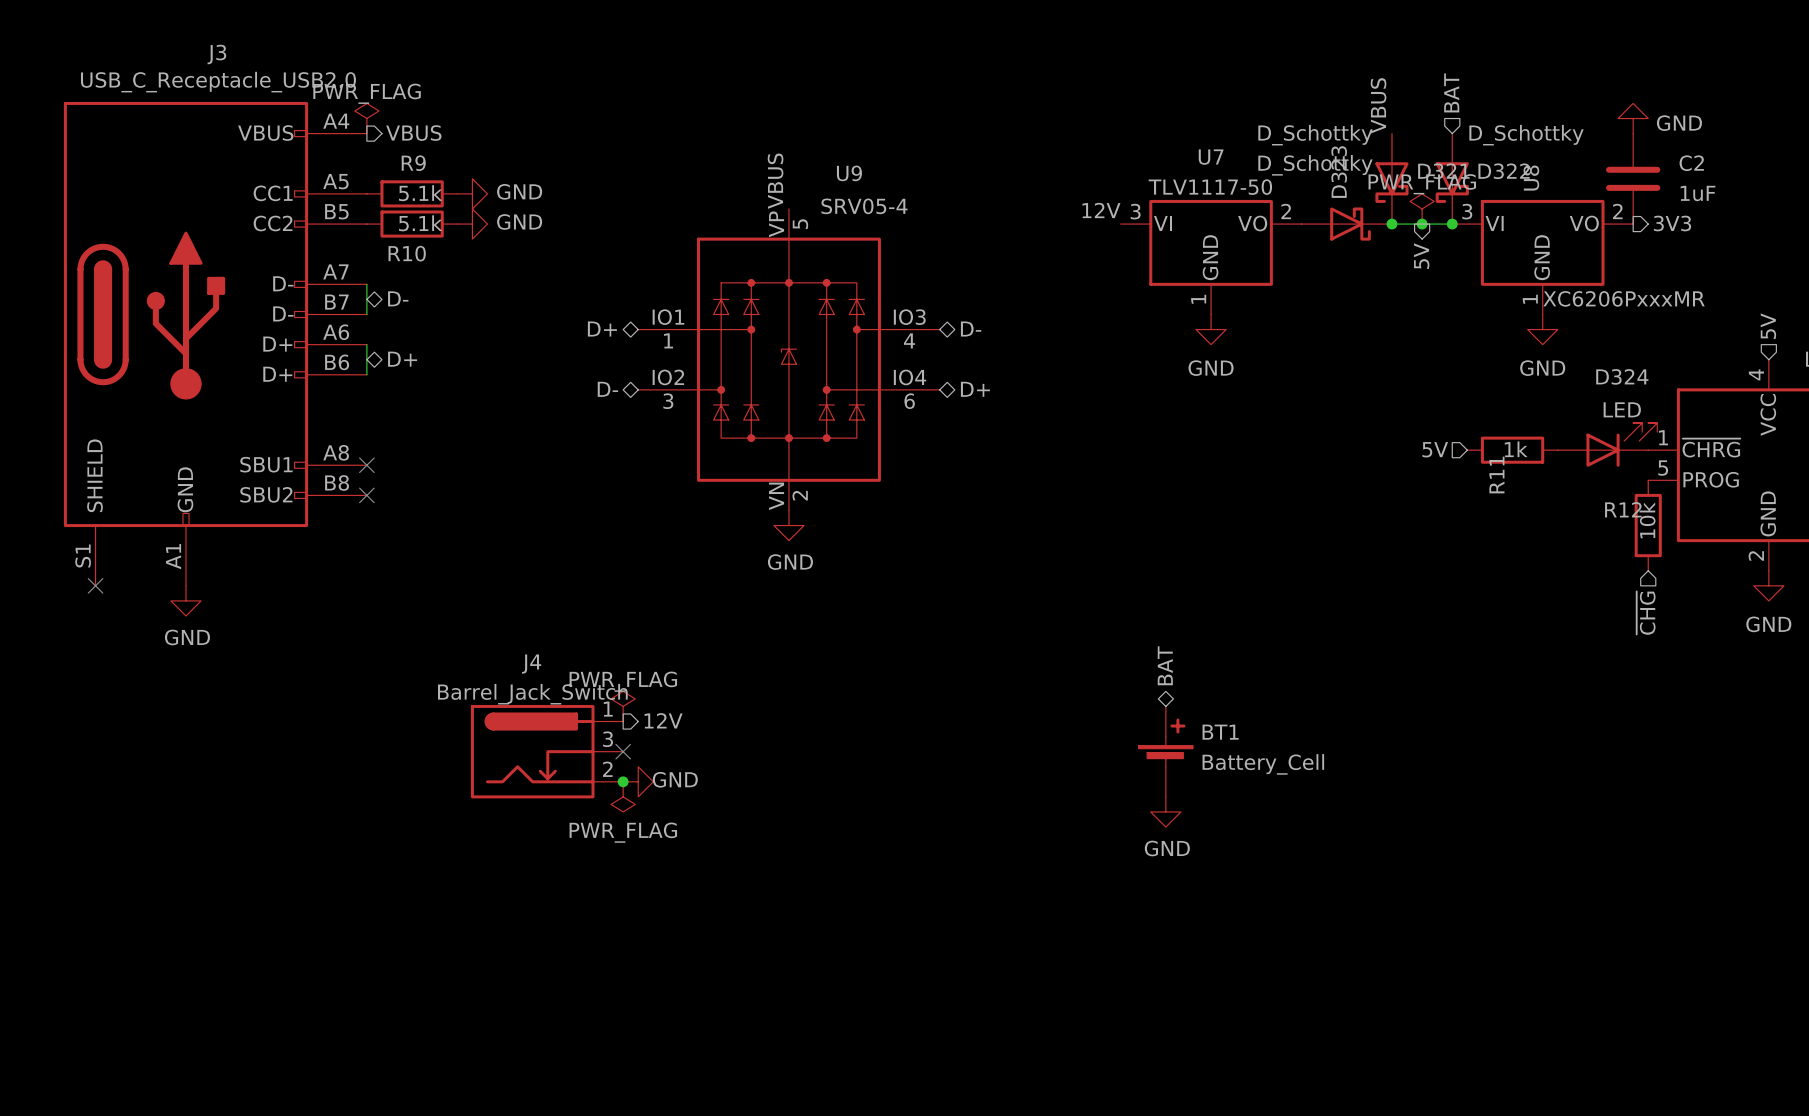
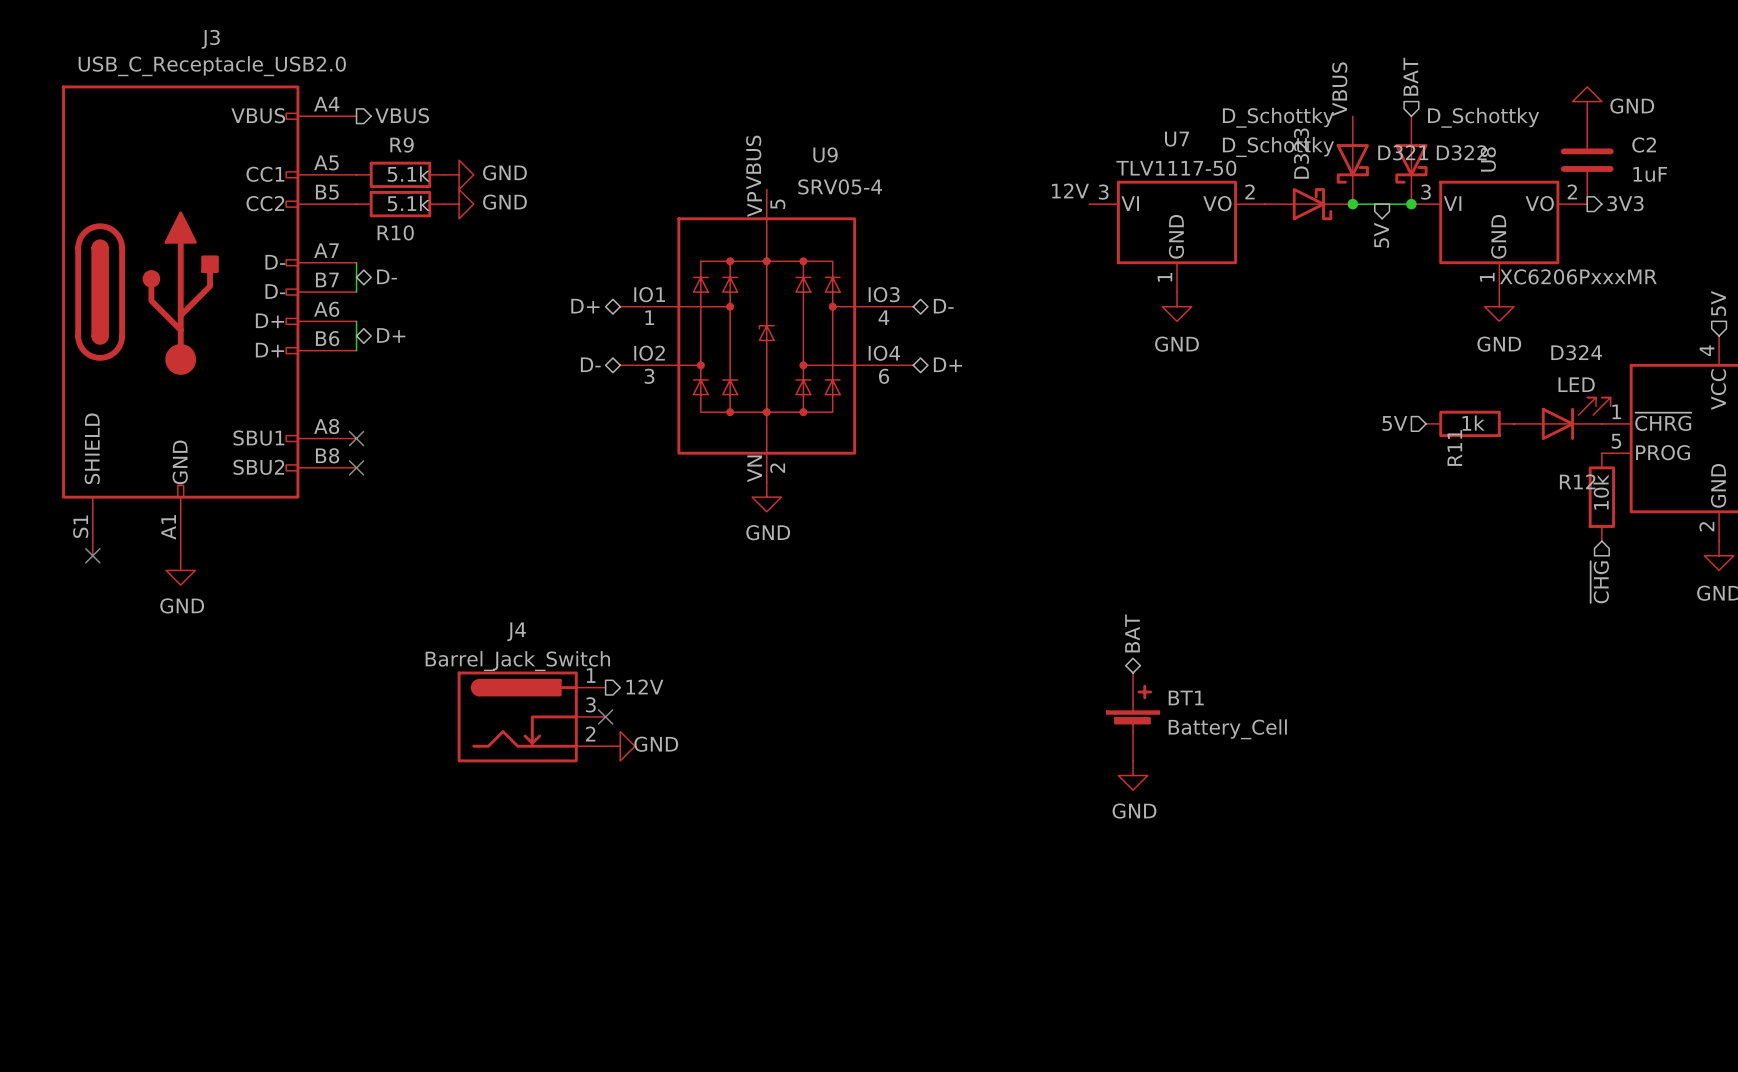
power symbol: PWR_FLAG (366, 118) -> none
power symbol: PWR_FLAG (1422, 208) -> none
junction: (1422, 224) -> none
power symbol: PWR_FLAG (623, 706) -> none
junction: (623, 781) -> none
power symbol: PWR_FLAG (623, 796) -> none

